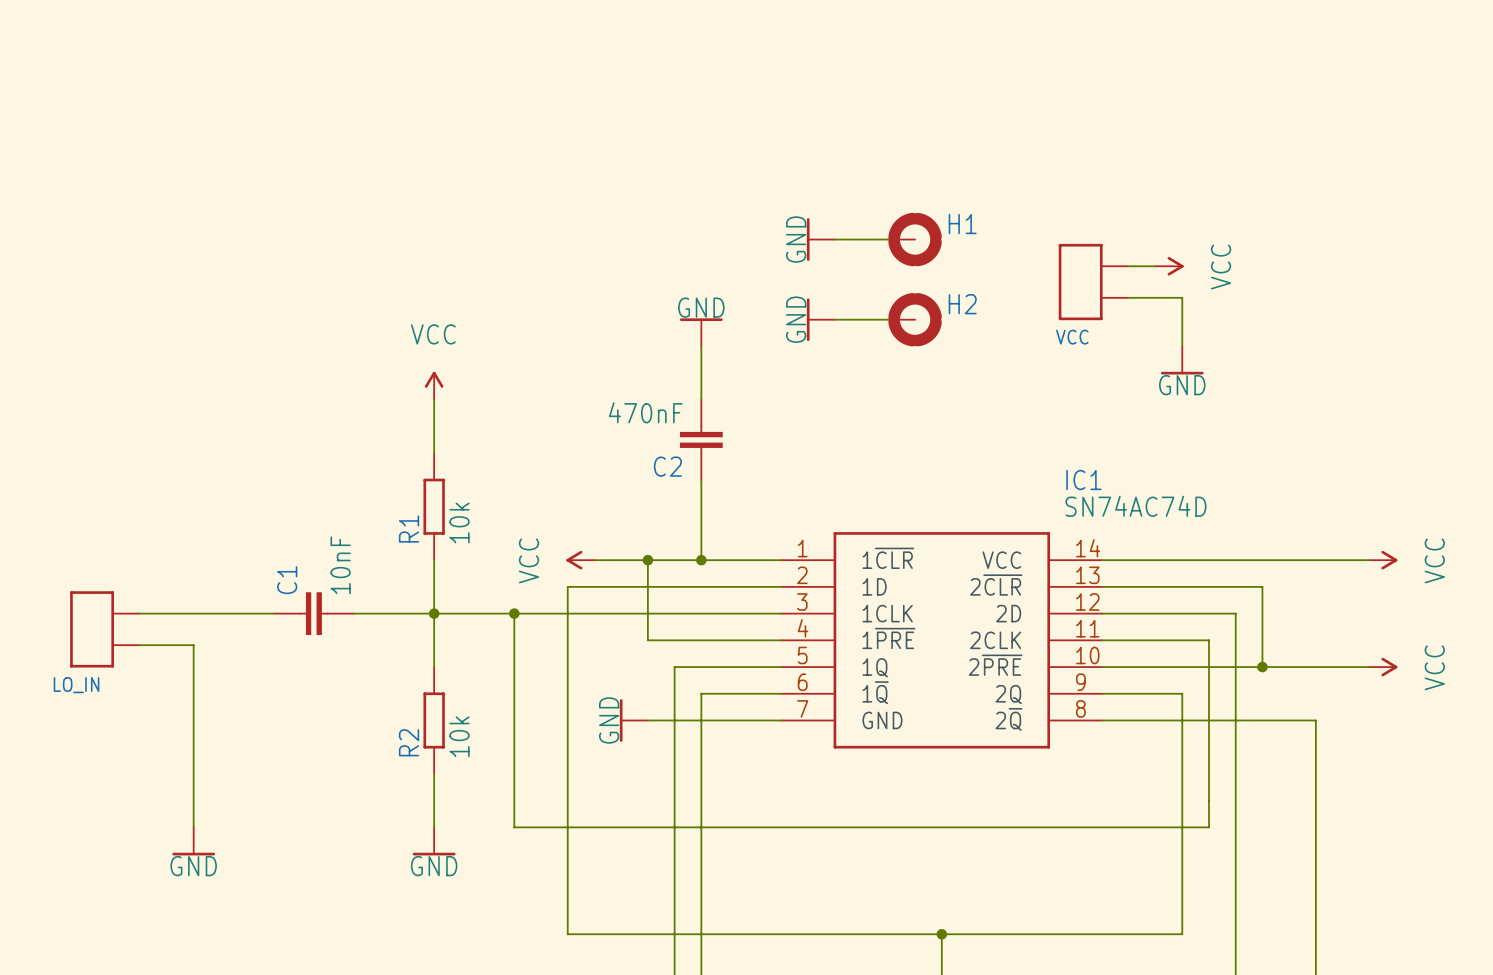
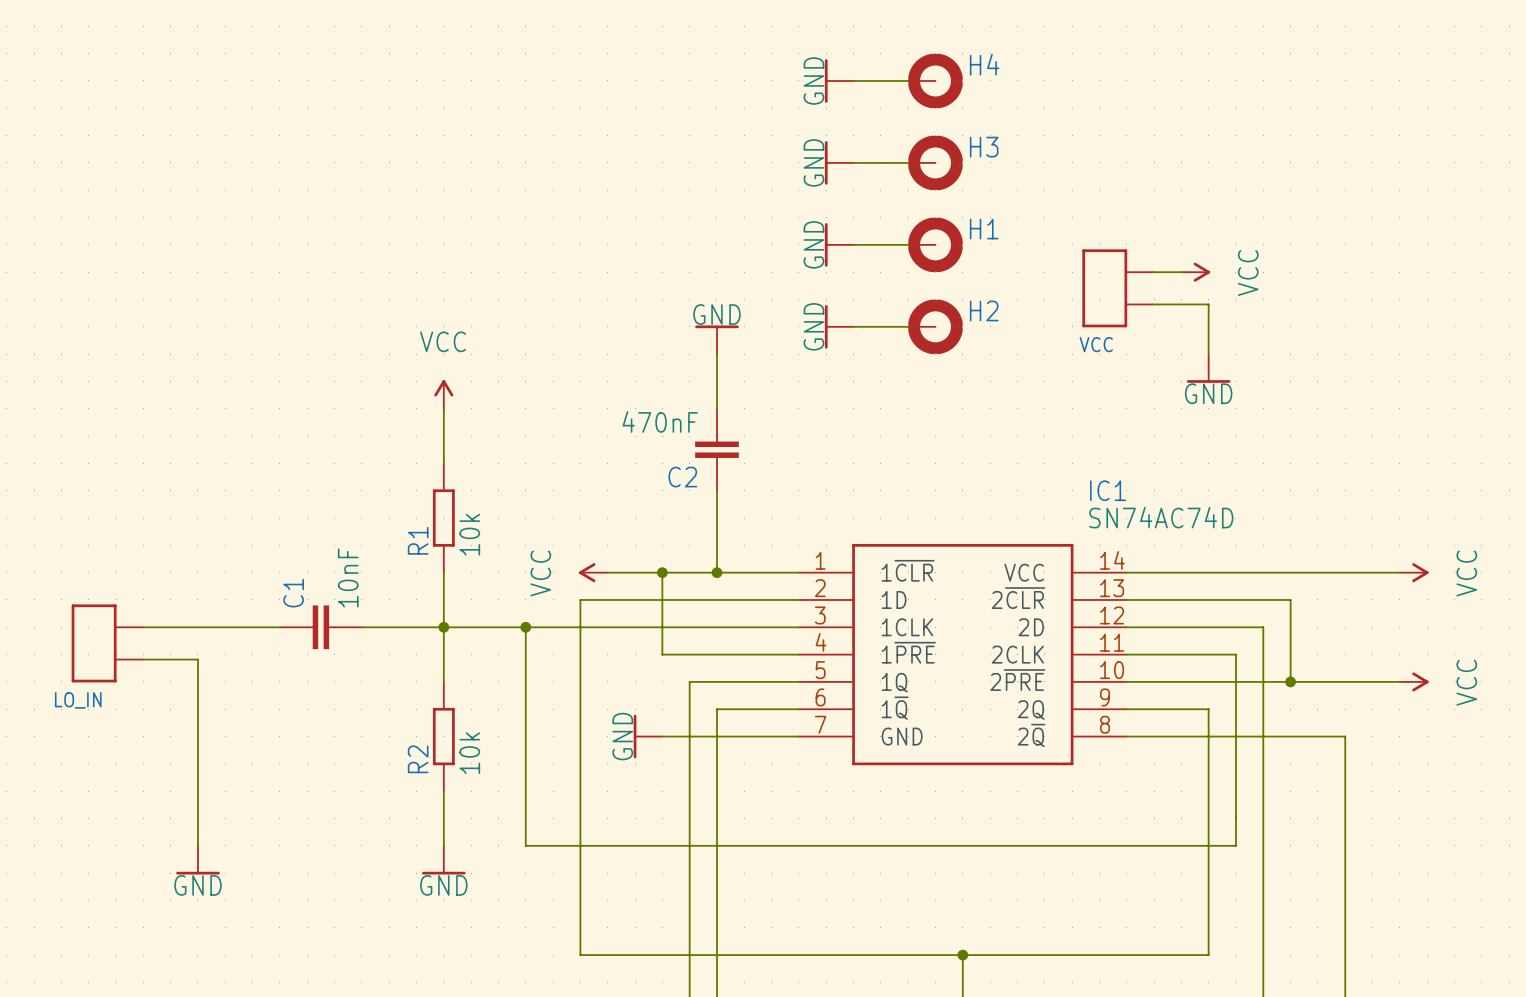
power symbol: none -> GND (839, 80)
wire: none -> (853, 80) (908, 80)
H4: none -> (935, 80)
power symbol: none -> GND (839, 162)
wire: none -> (853, 162) (908, 162)
H3: none -> (935, 162)

